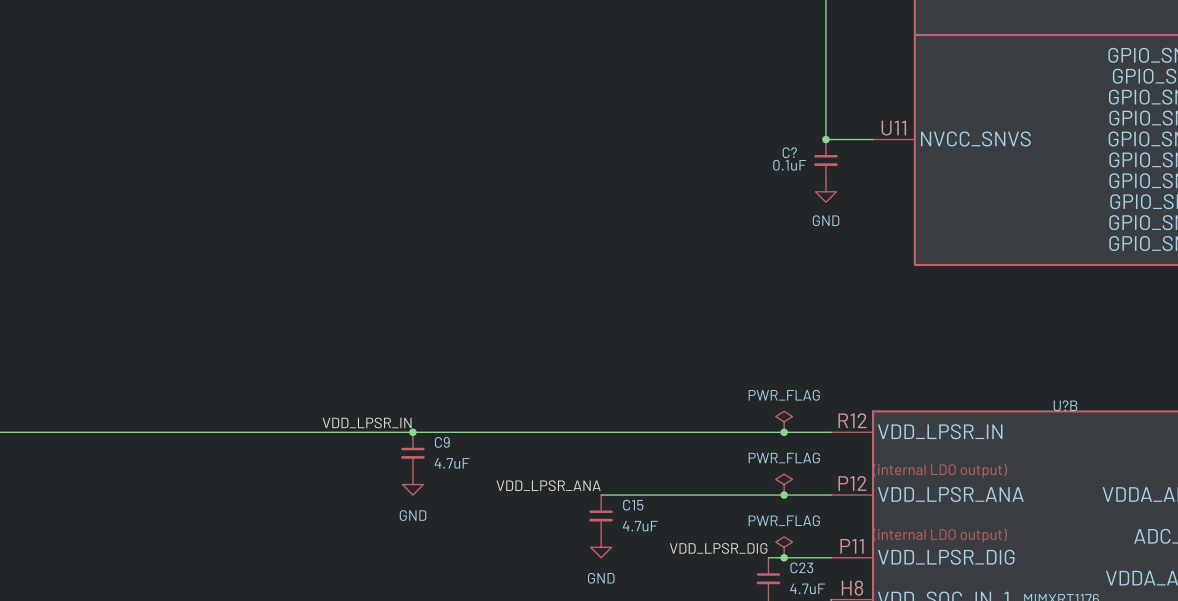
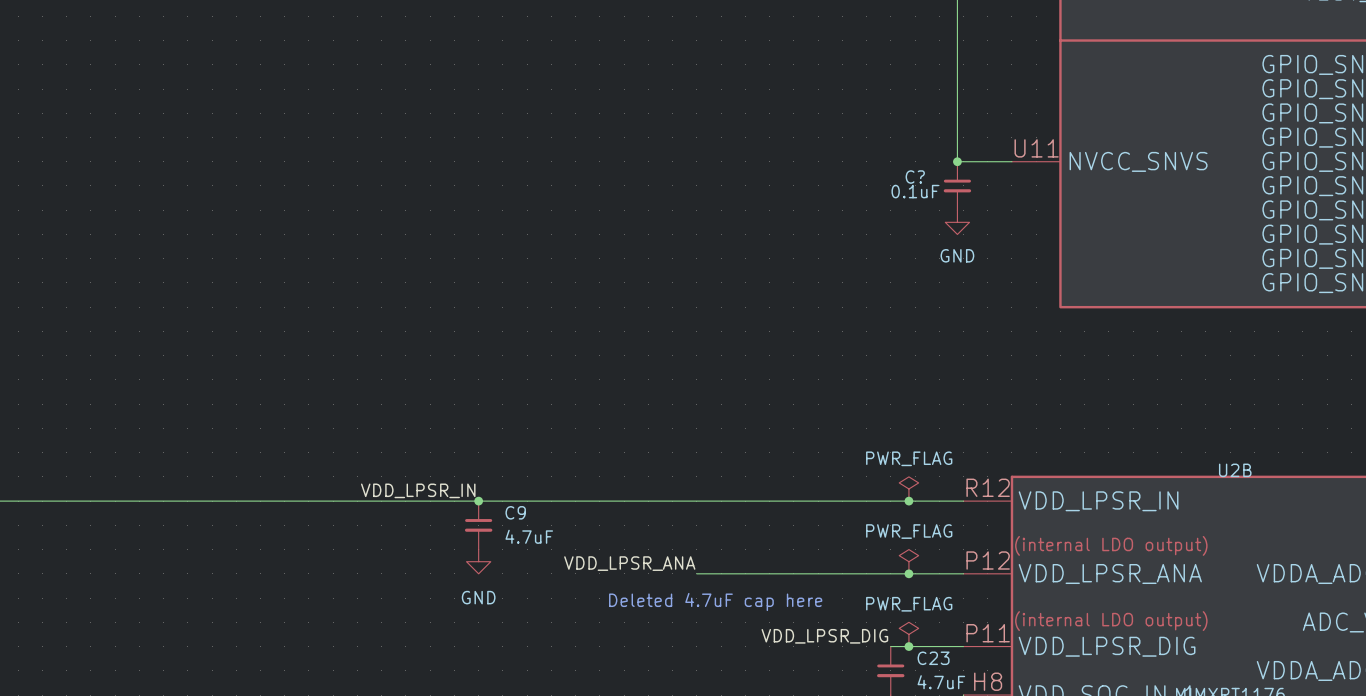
U?B name: U?B (1065, 405) -> U2B (1235, 470)
C15: 4.7uF (601, 515) -> none
text: none -> Deleted 4.7uF cap here (715, 601)
power symbol: GND (601, 547) -> none

